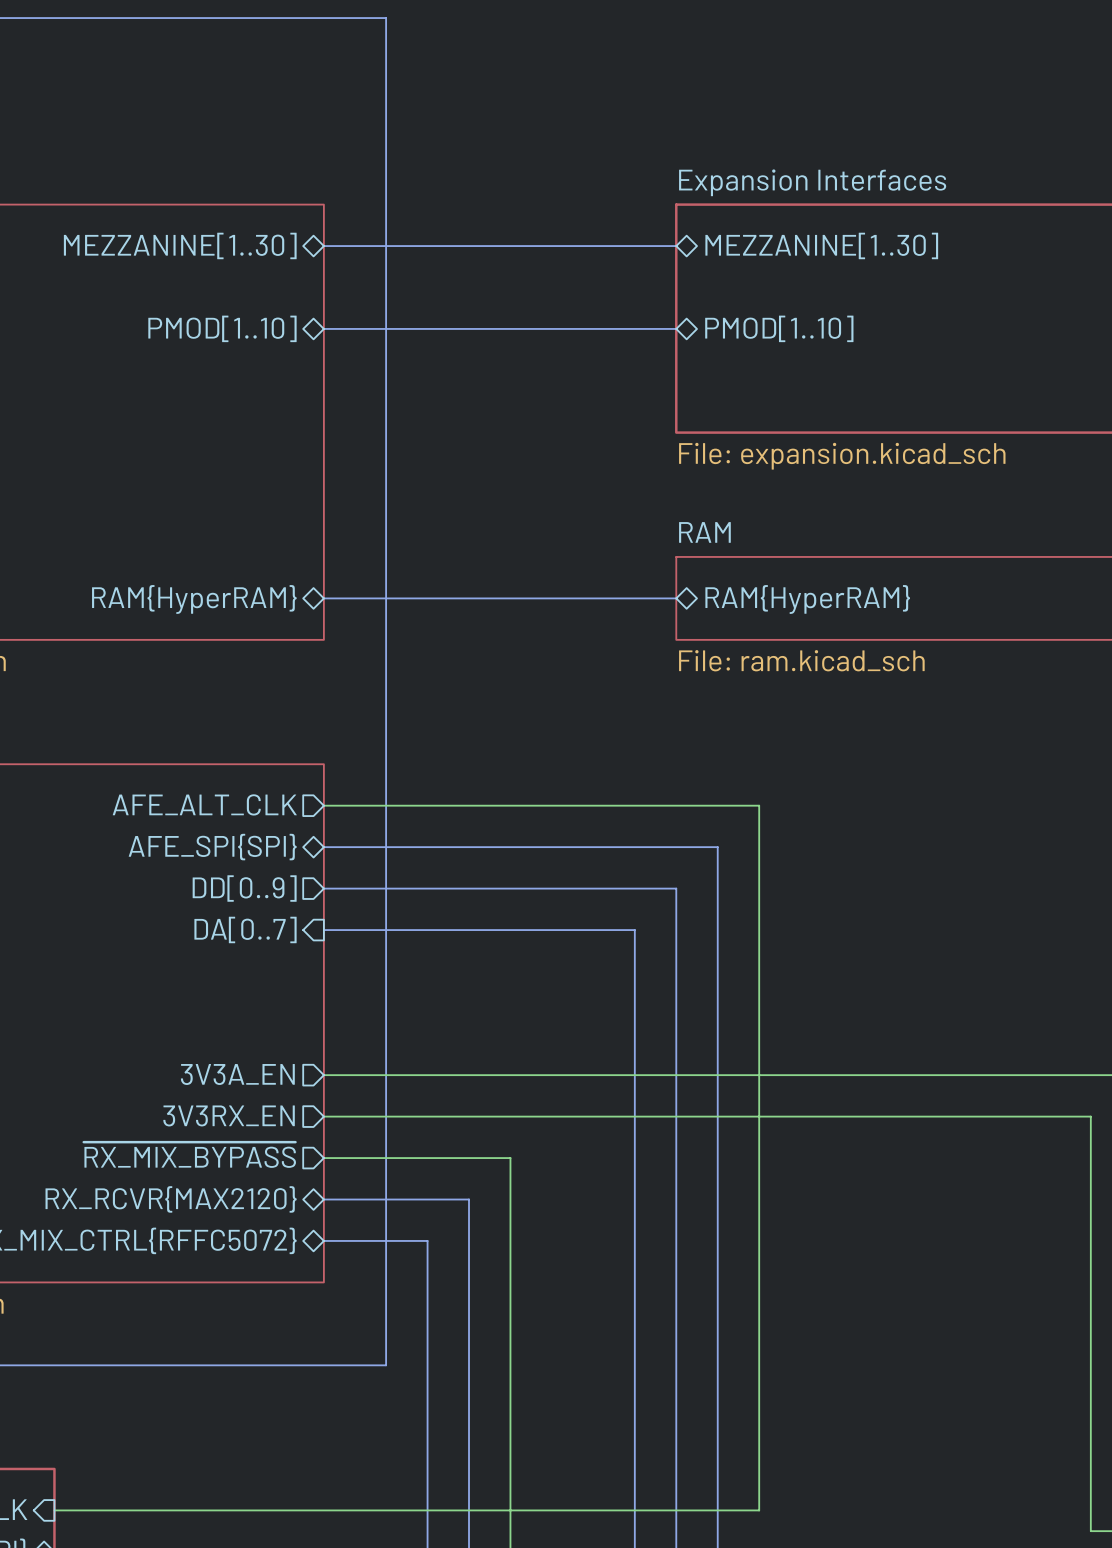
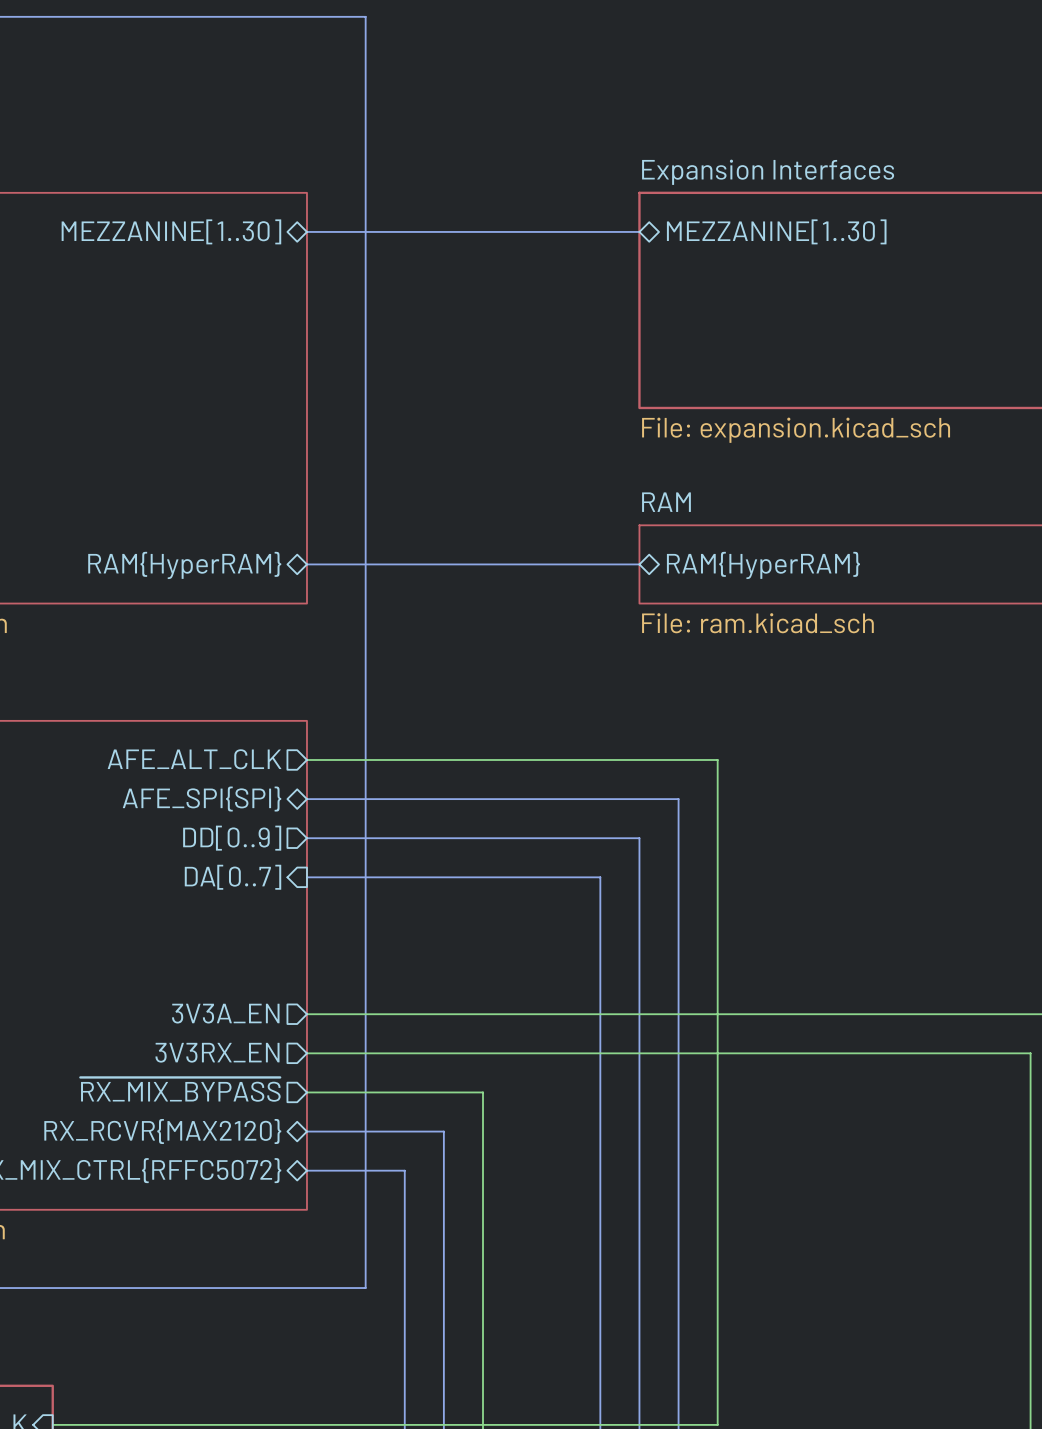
sheet pin: PMOD[1..10] (222, 328) -> none
bus: (323, 328) (676, 328) -> none
sheet pin: PMOD[1..10] (779, 328) -> none

